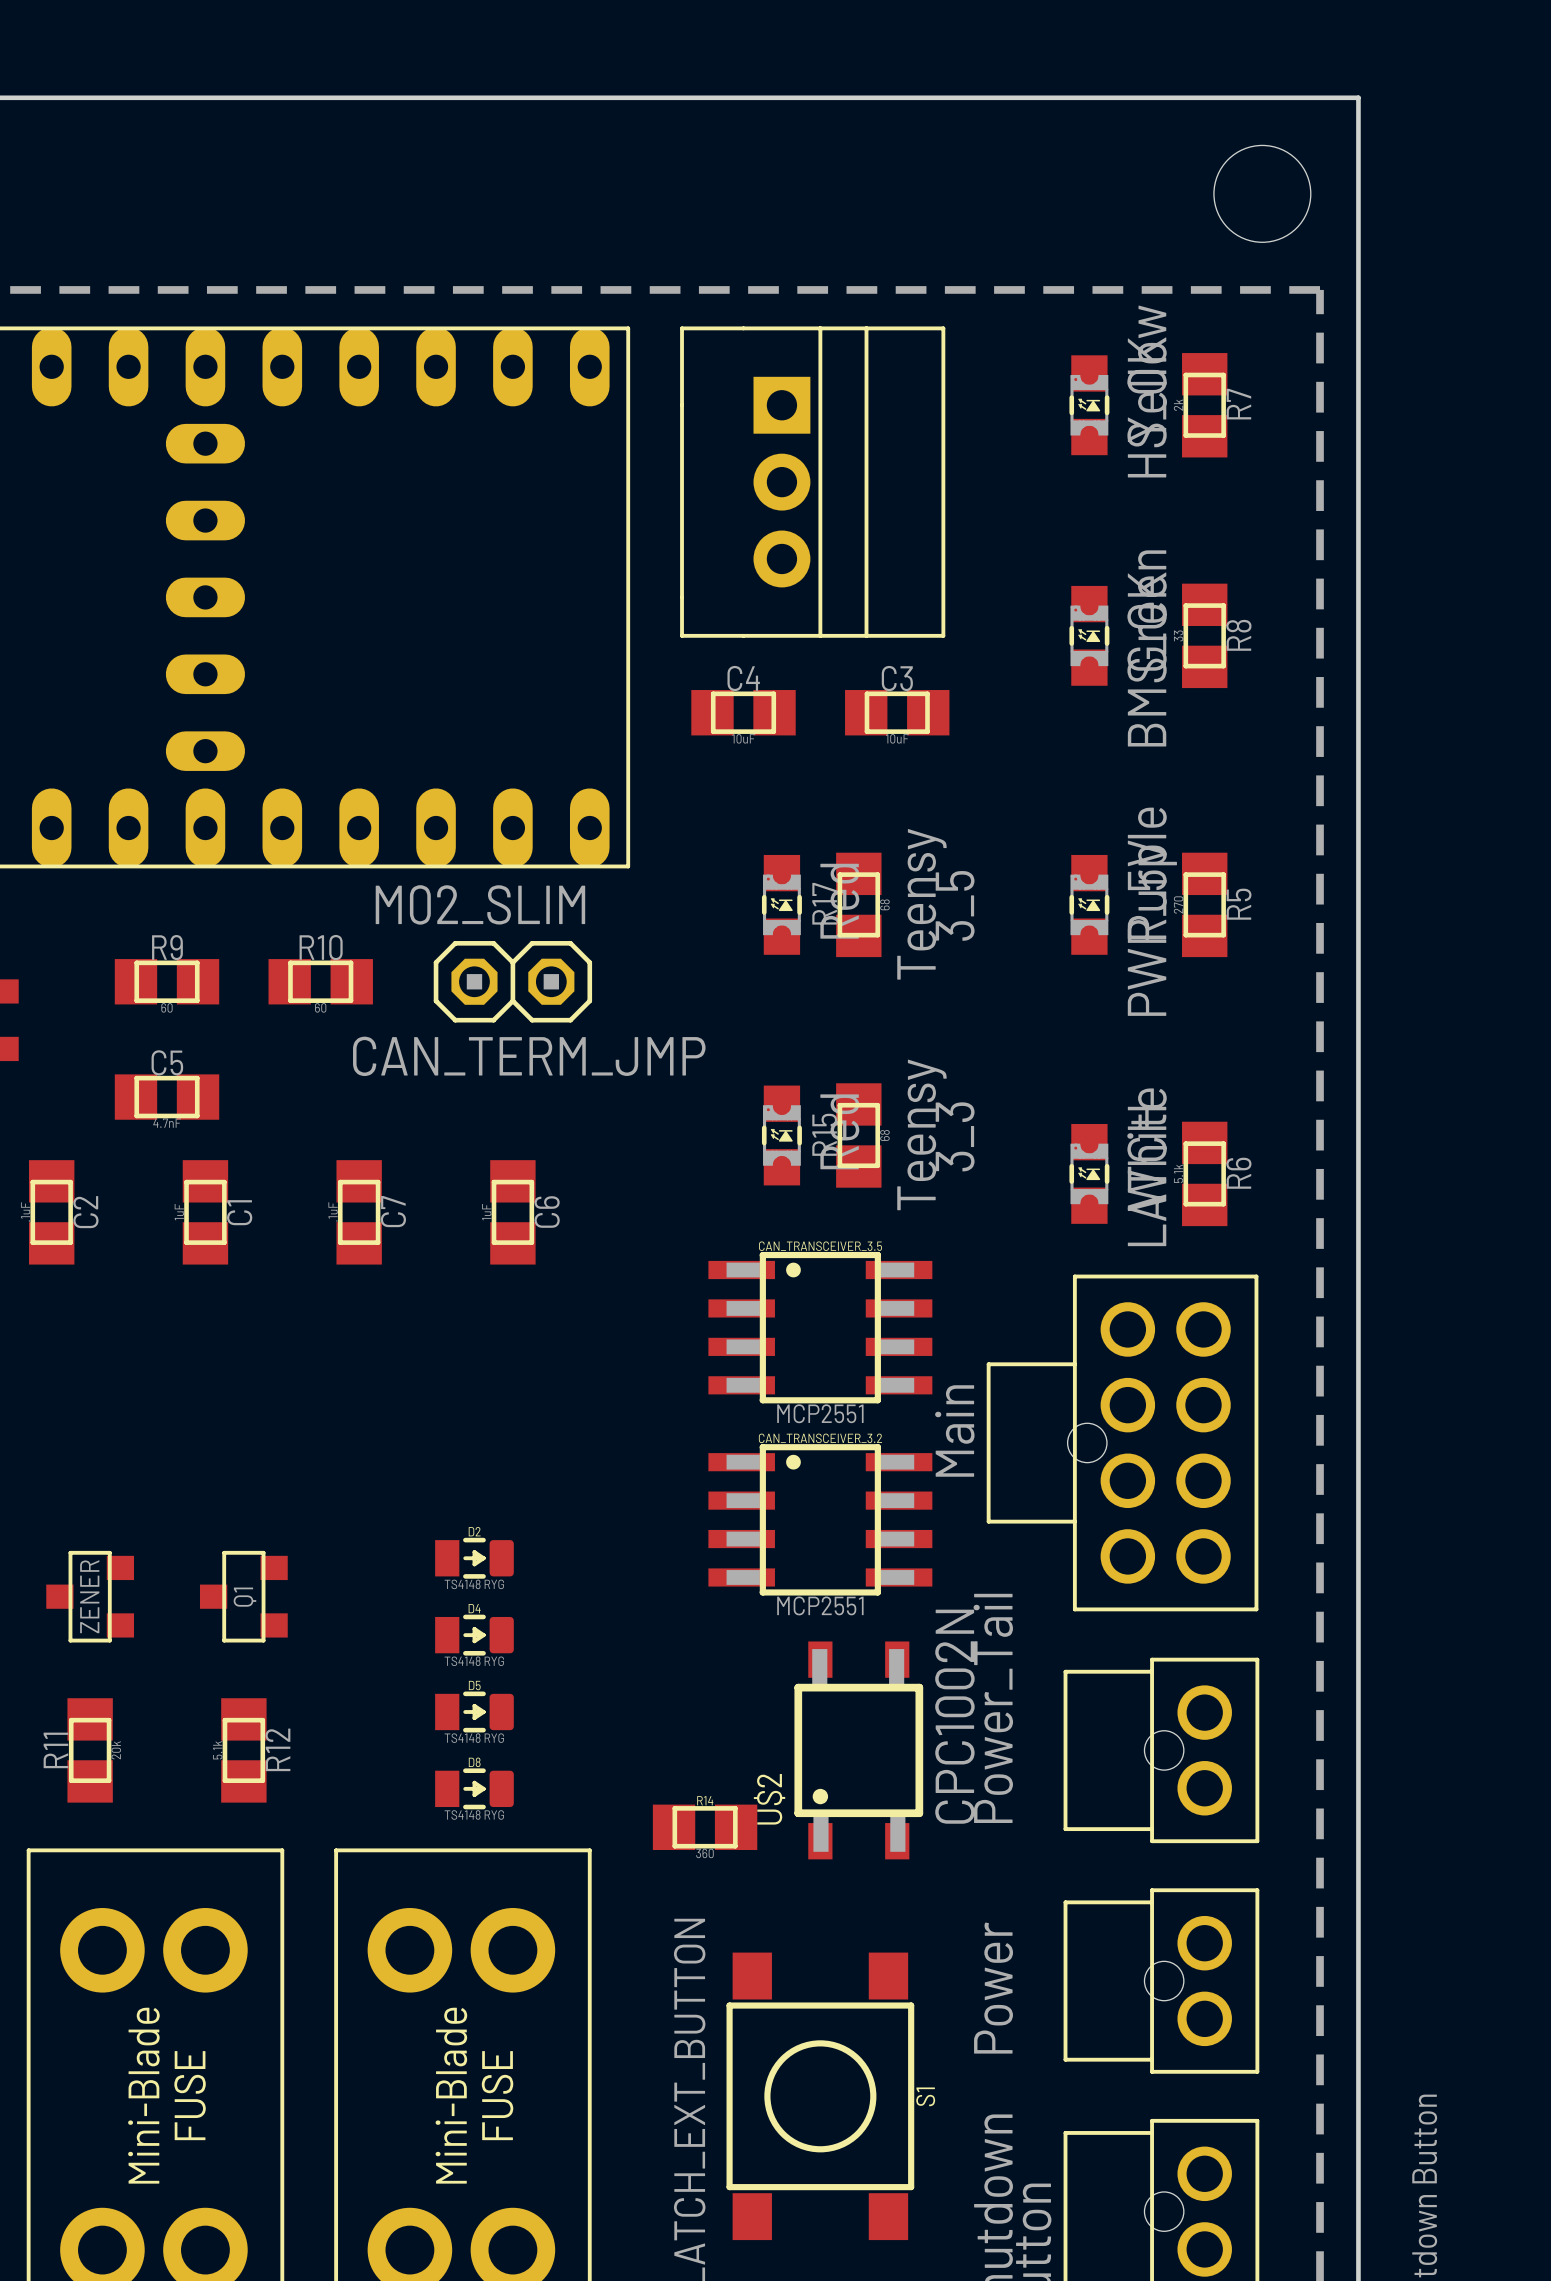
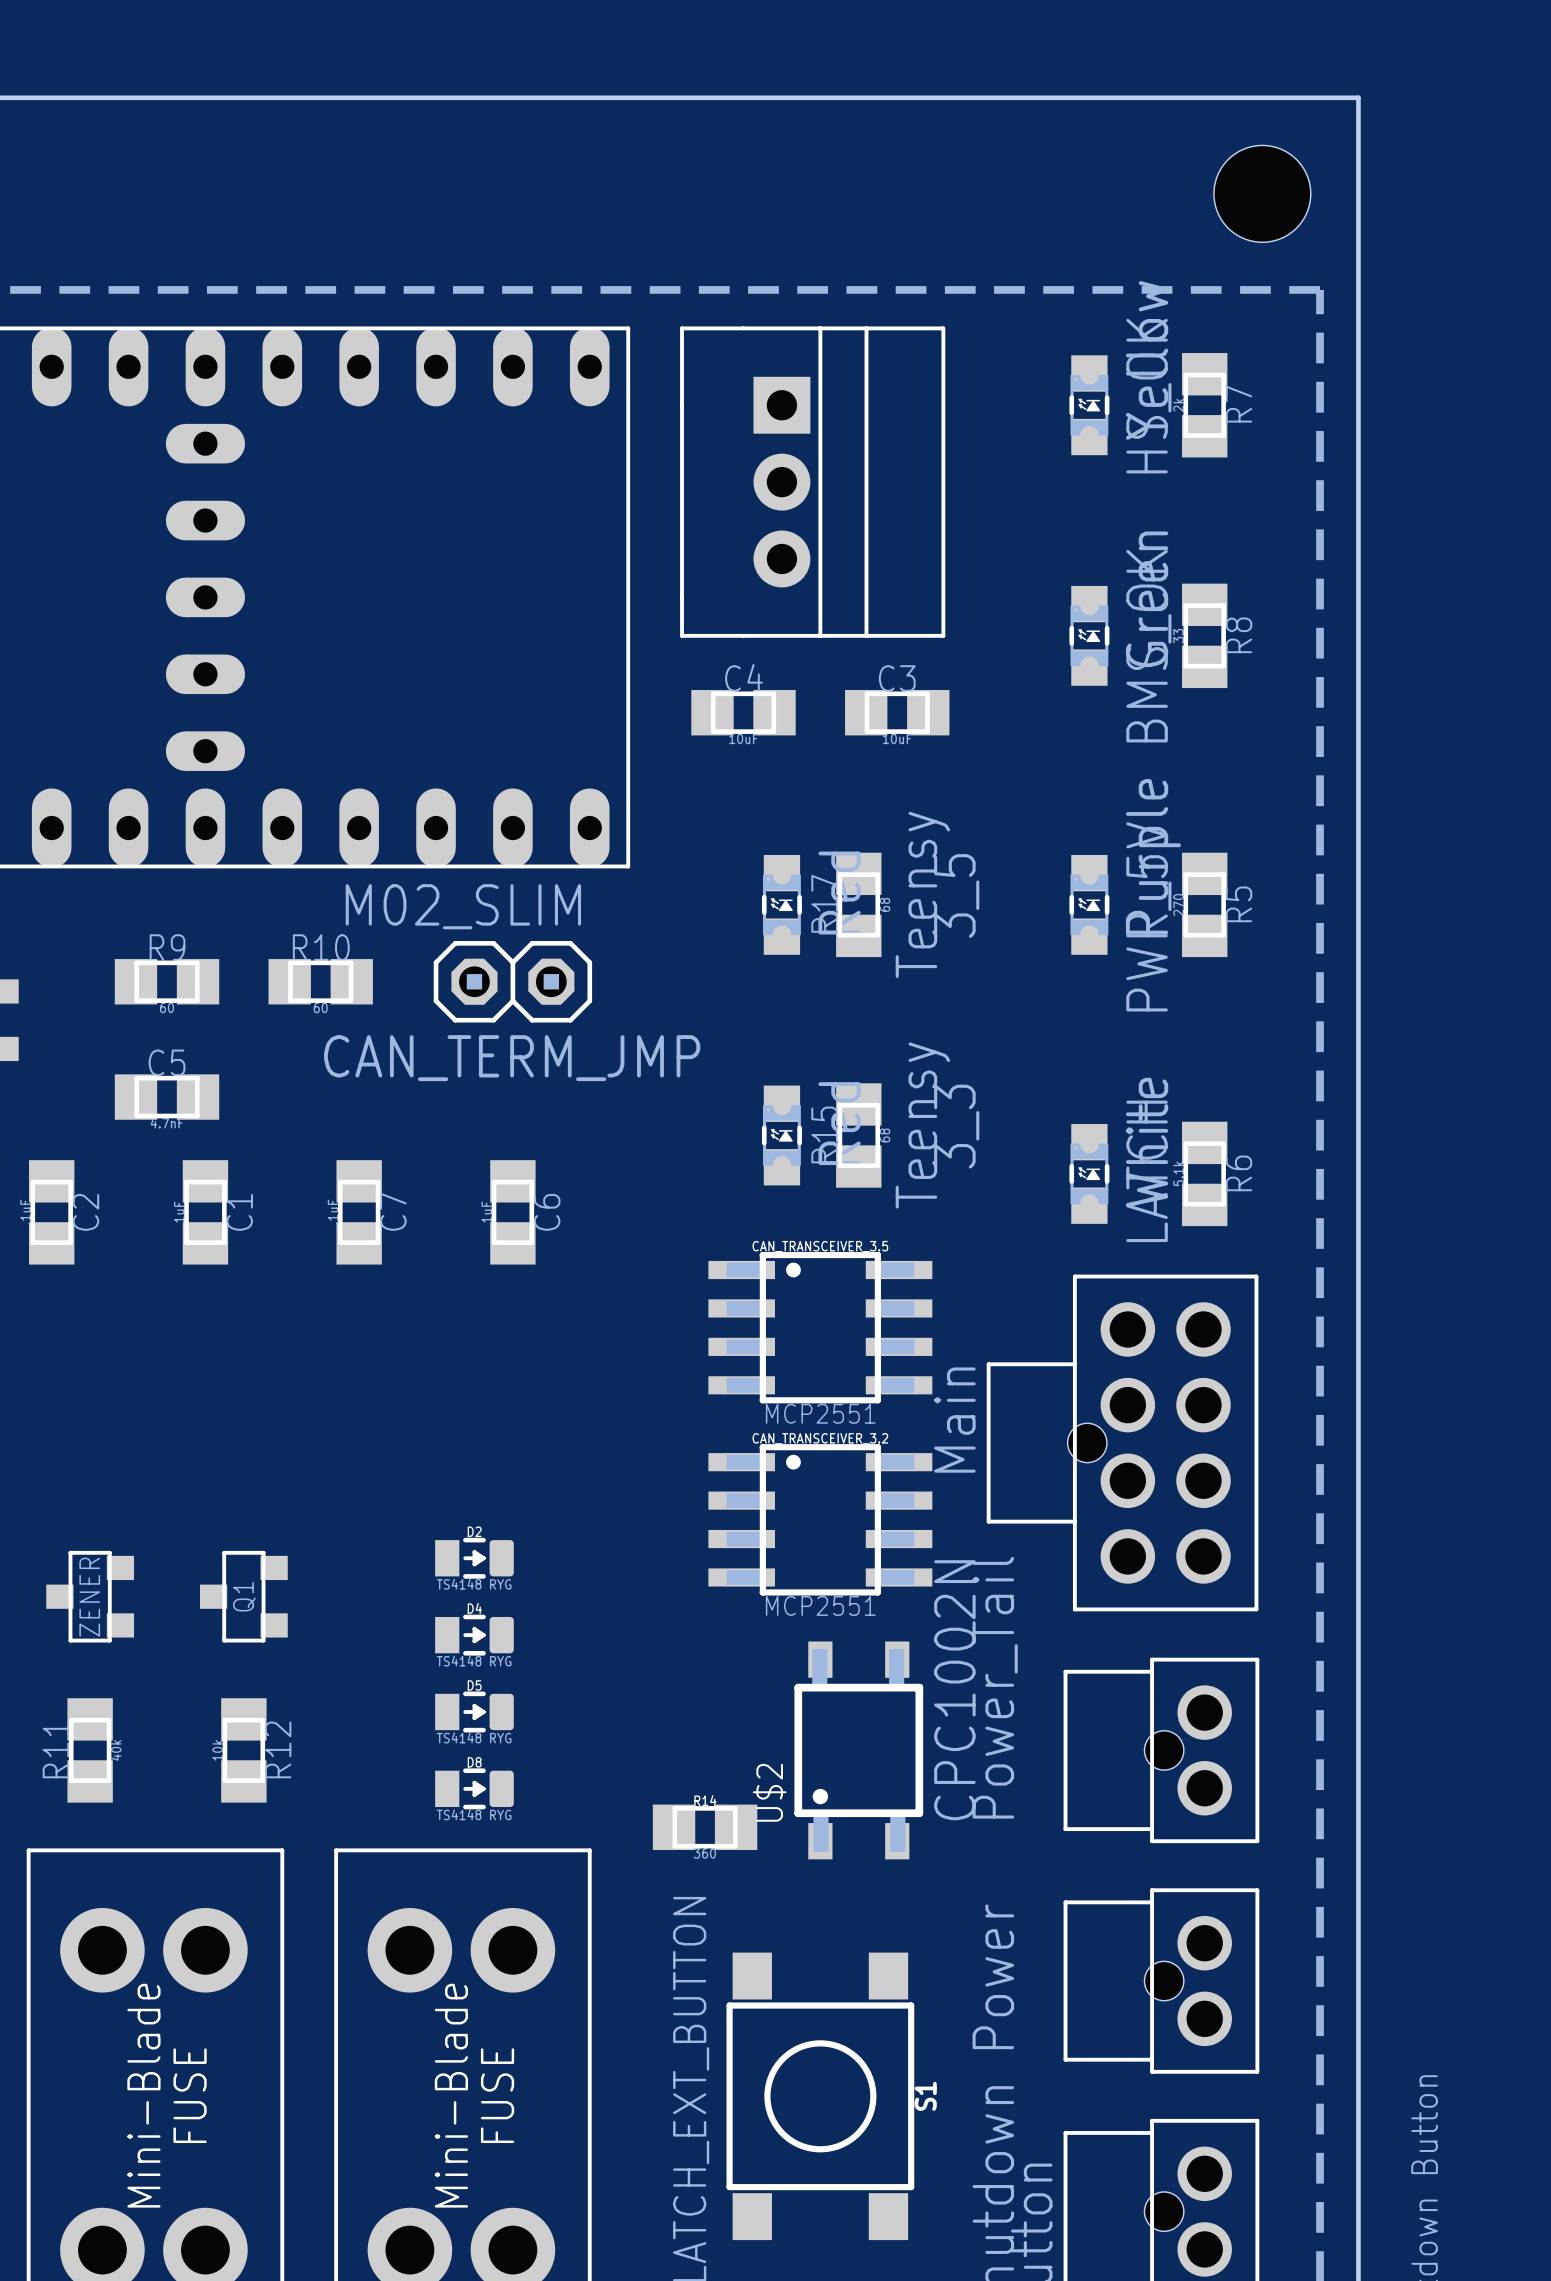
R11 value: 20k (116, 1750) -> 40k (116, 1750)
R12 value: 5.1k (217, 1750) -> 10k (217, 1750)

